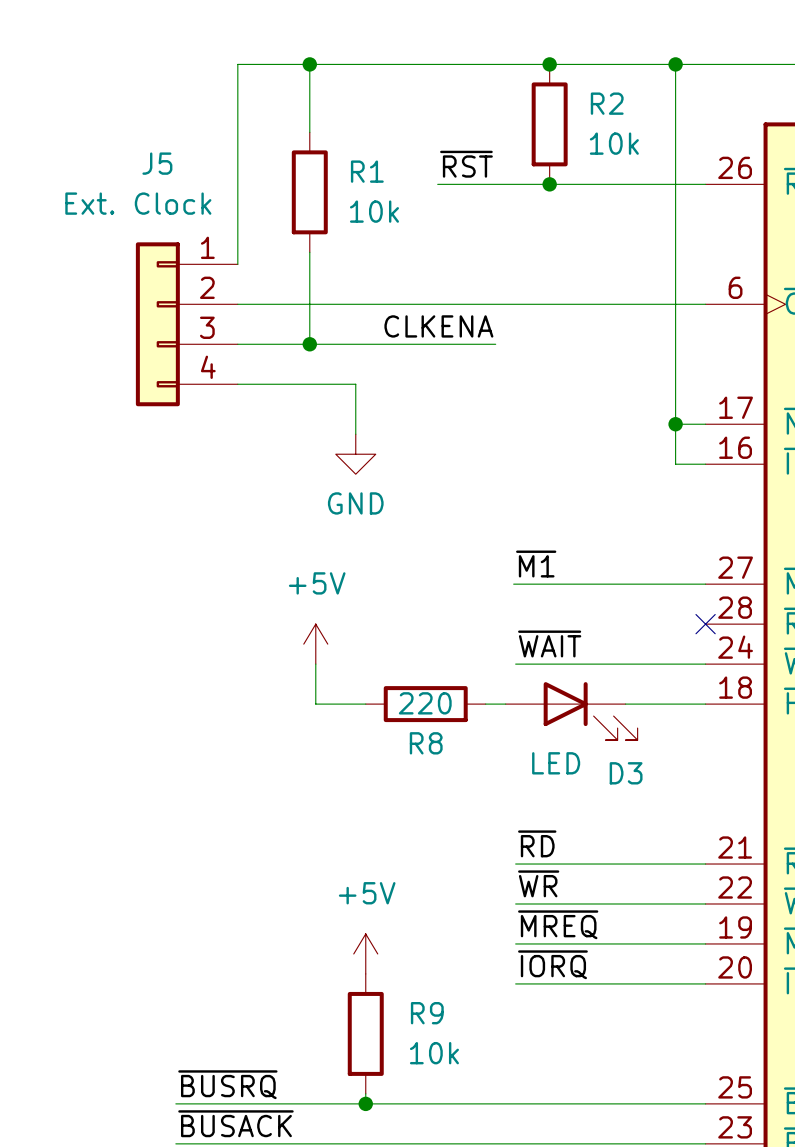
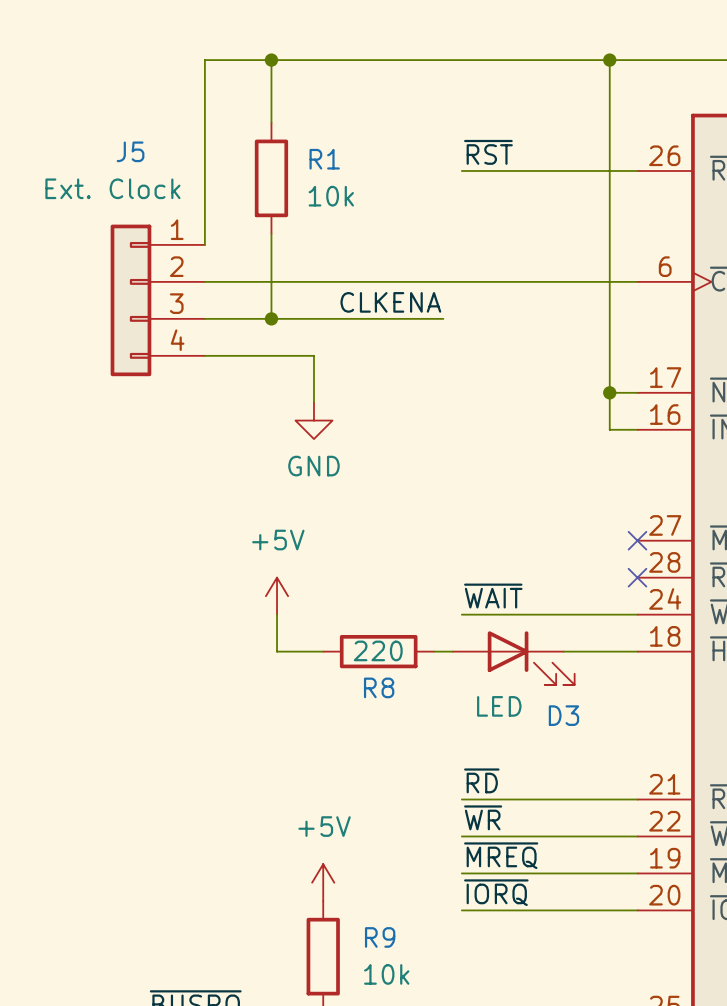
junction: (549, 64) -> none
R2: 10k (549, 124) -> none
label position: ~{RST} (466, 164) -> ~{RST} (488, 152)
wire: (437, 184) (515, 184) -> none
junction: (549, 184) -> none
label: ~{M1} (536, 564) -> none
wire: (513, 584) (705, 584) -> none
no-connect mark: none -> (637, 540)

